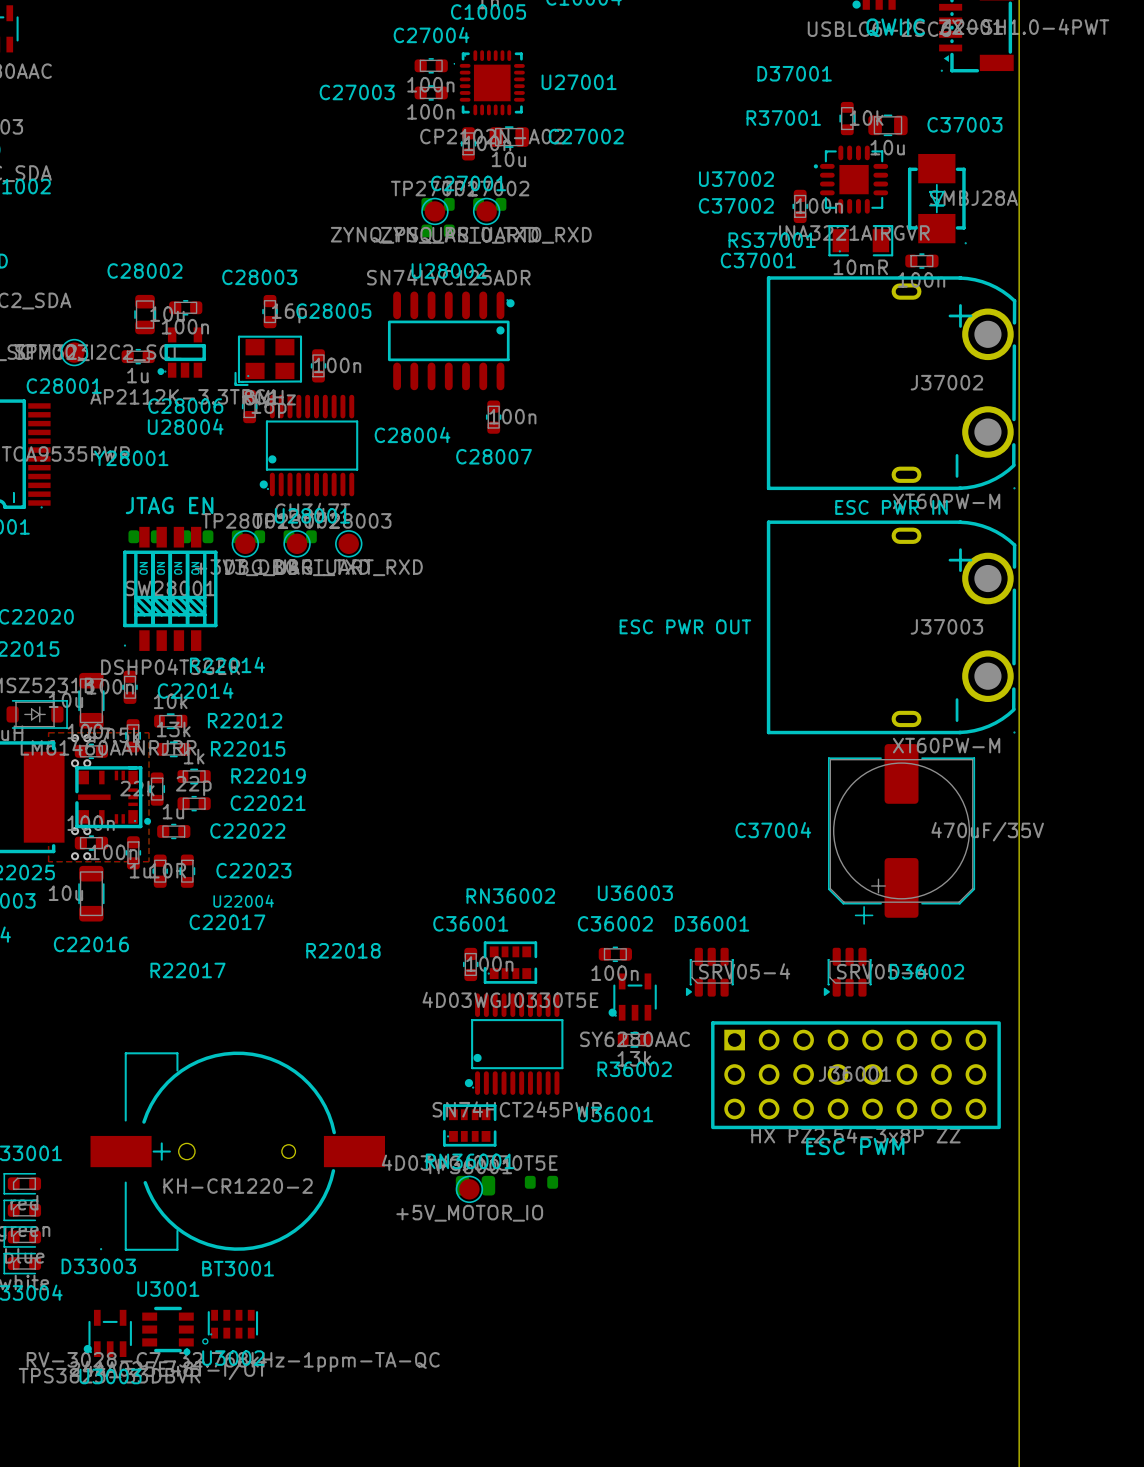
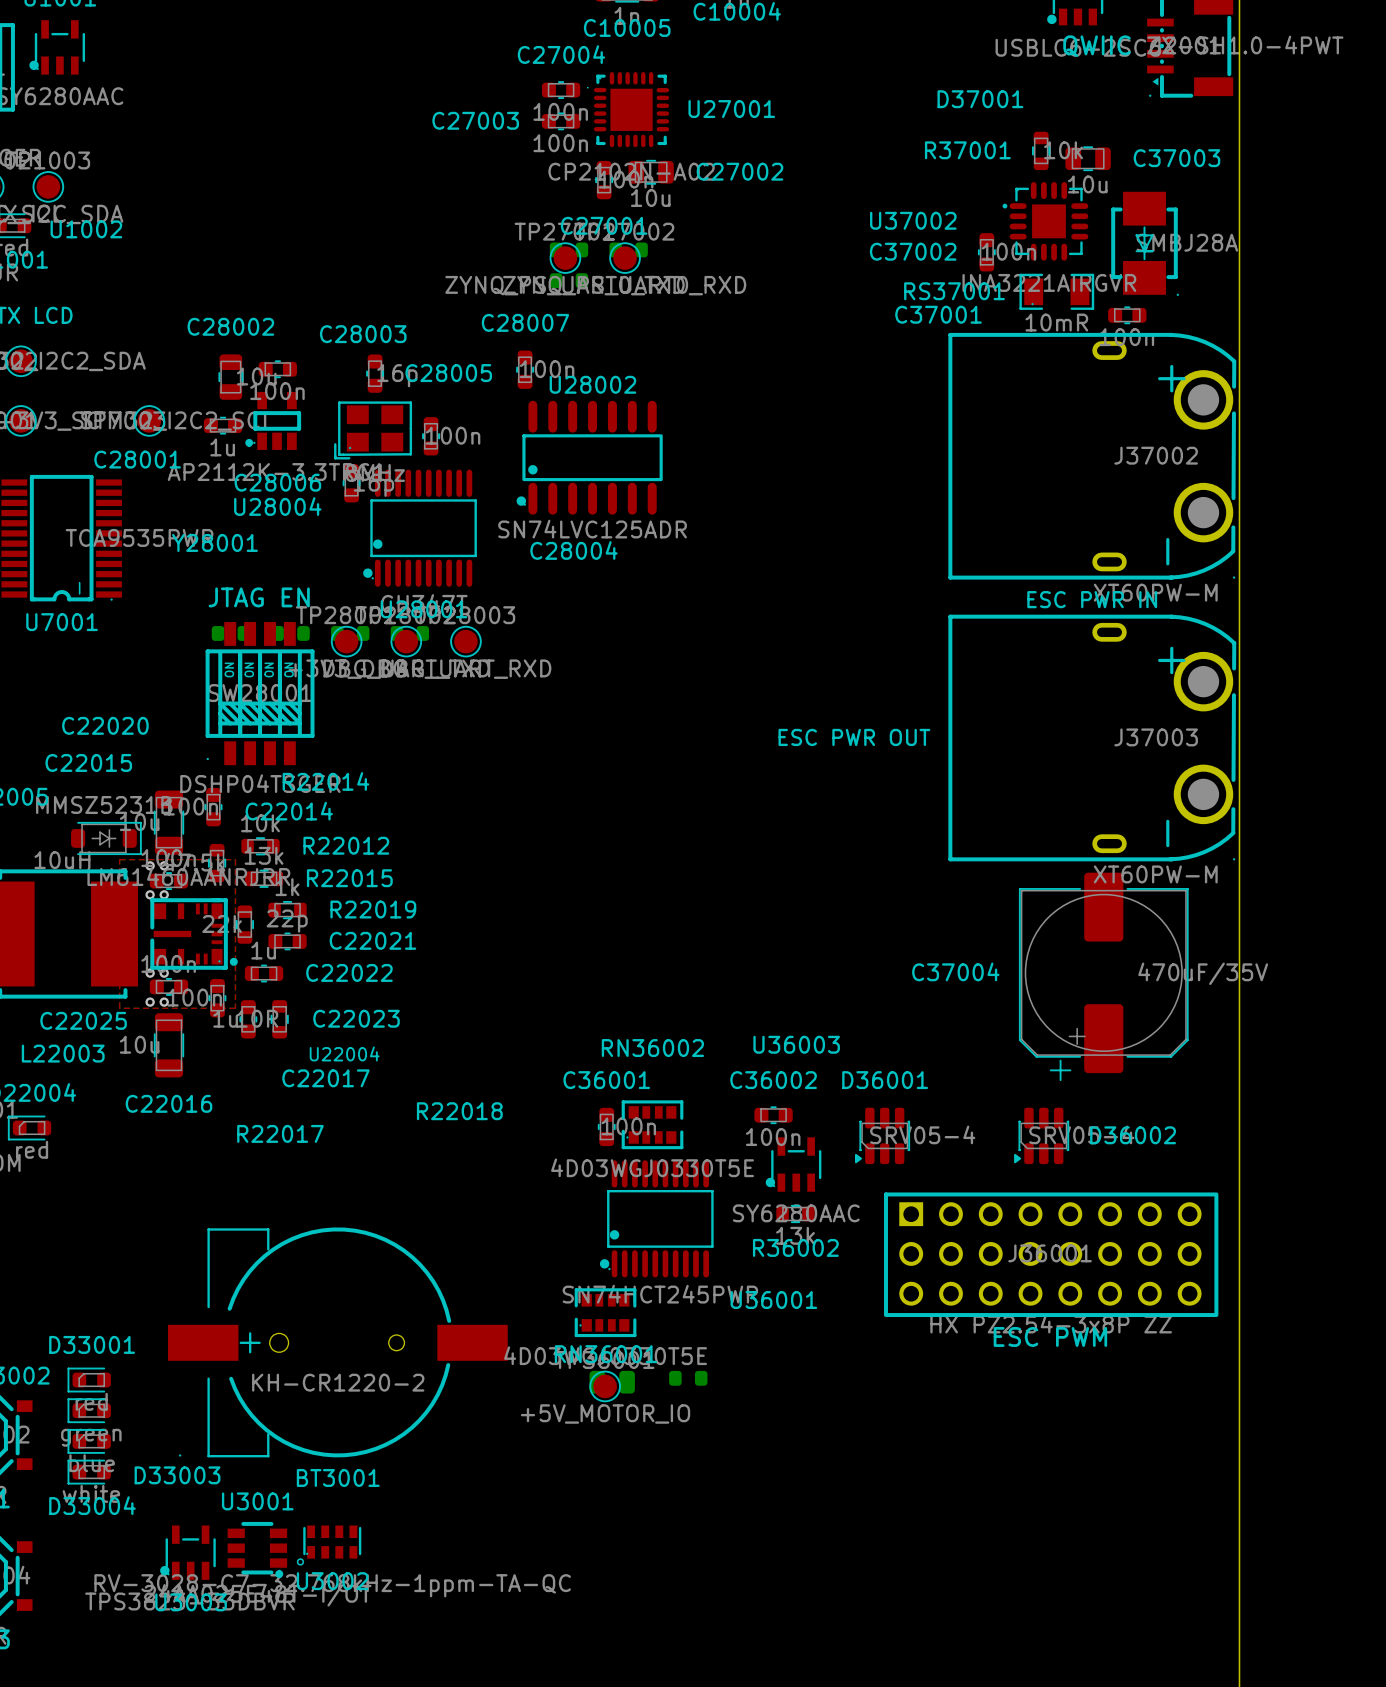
U28002 rotation: 0° (451, 340) -> 180° (589, 457)
C28007 position: (493, 417) -> (525, 369)
C28004 name position: C28004 (412, 435) -> C28004 (573, 550)
C28007 name position: C28007 (494, 456) -> C28007 (525, 322)

